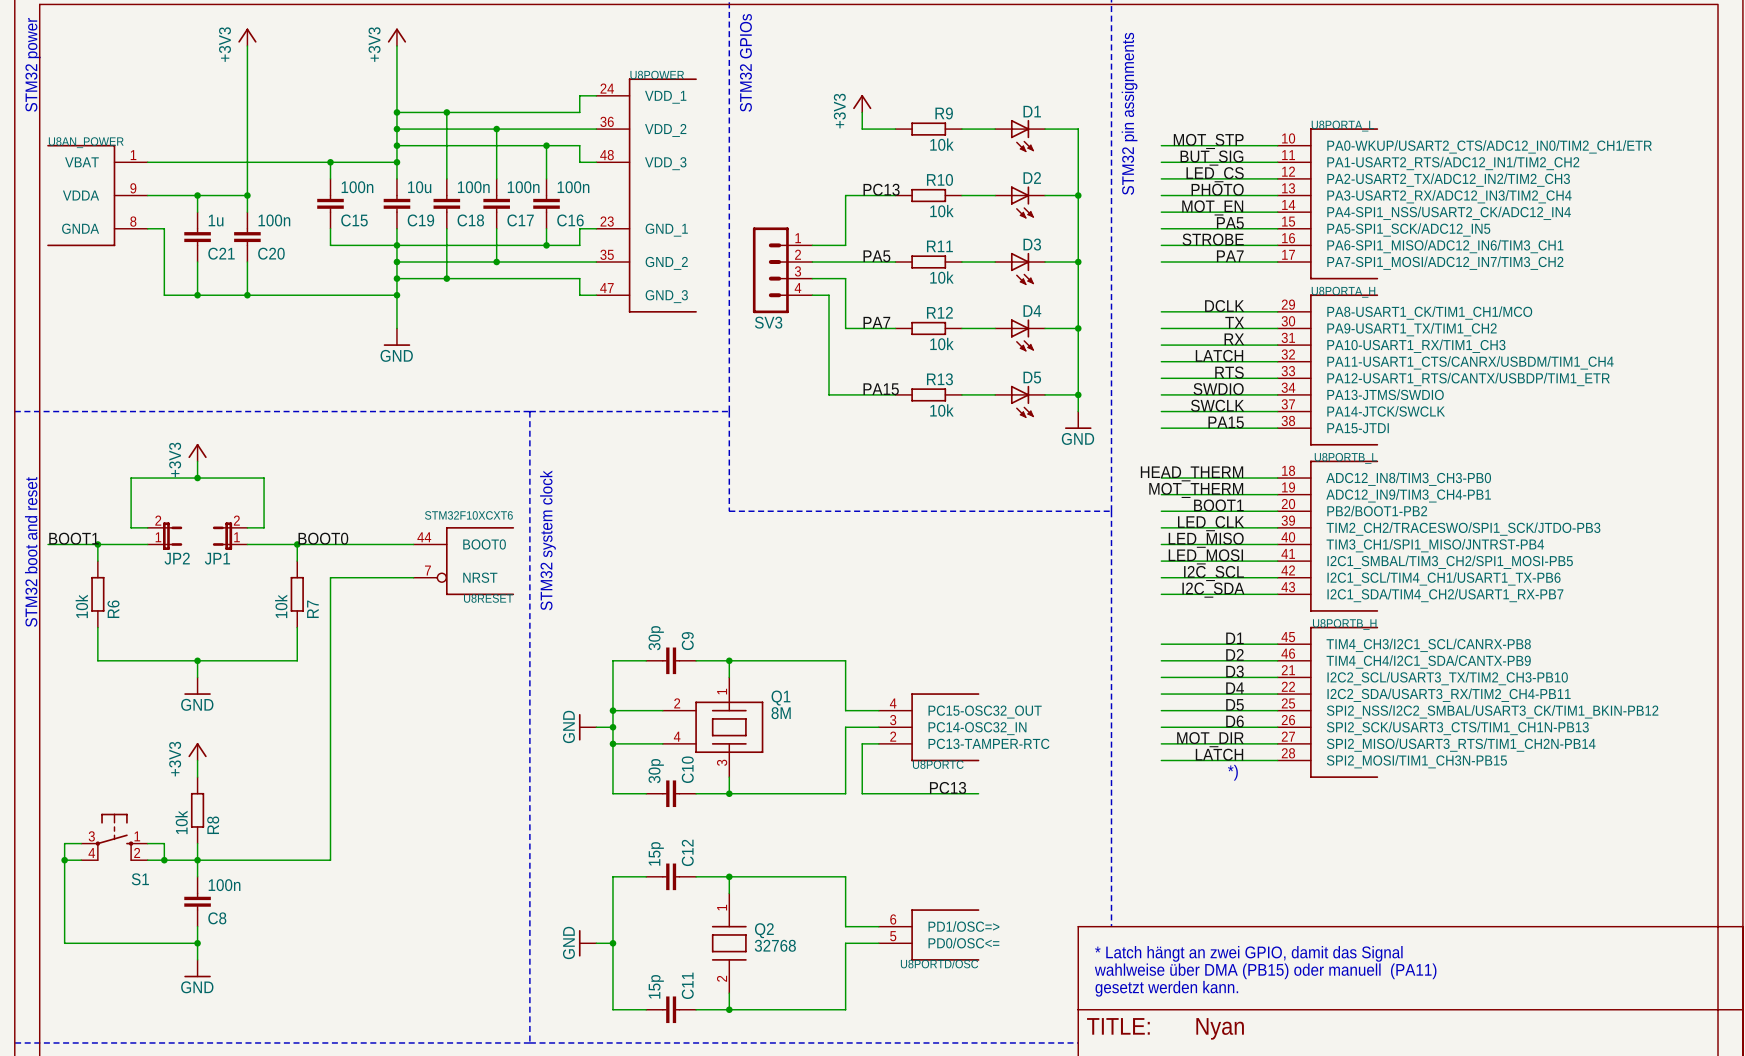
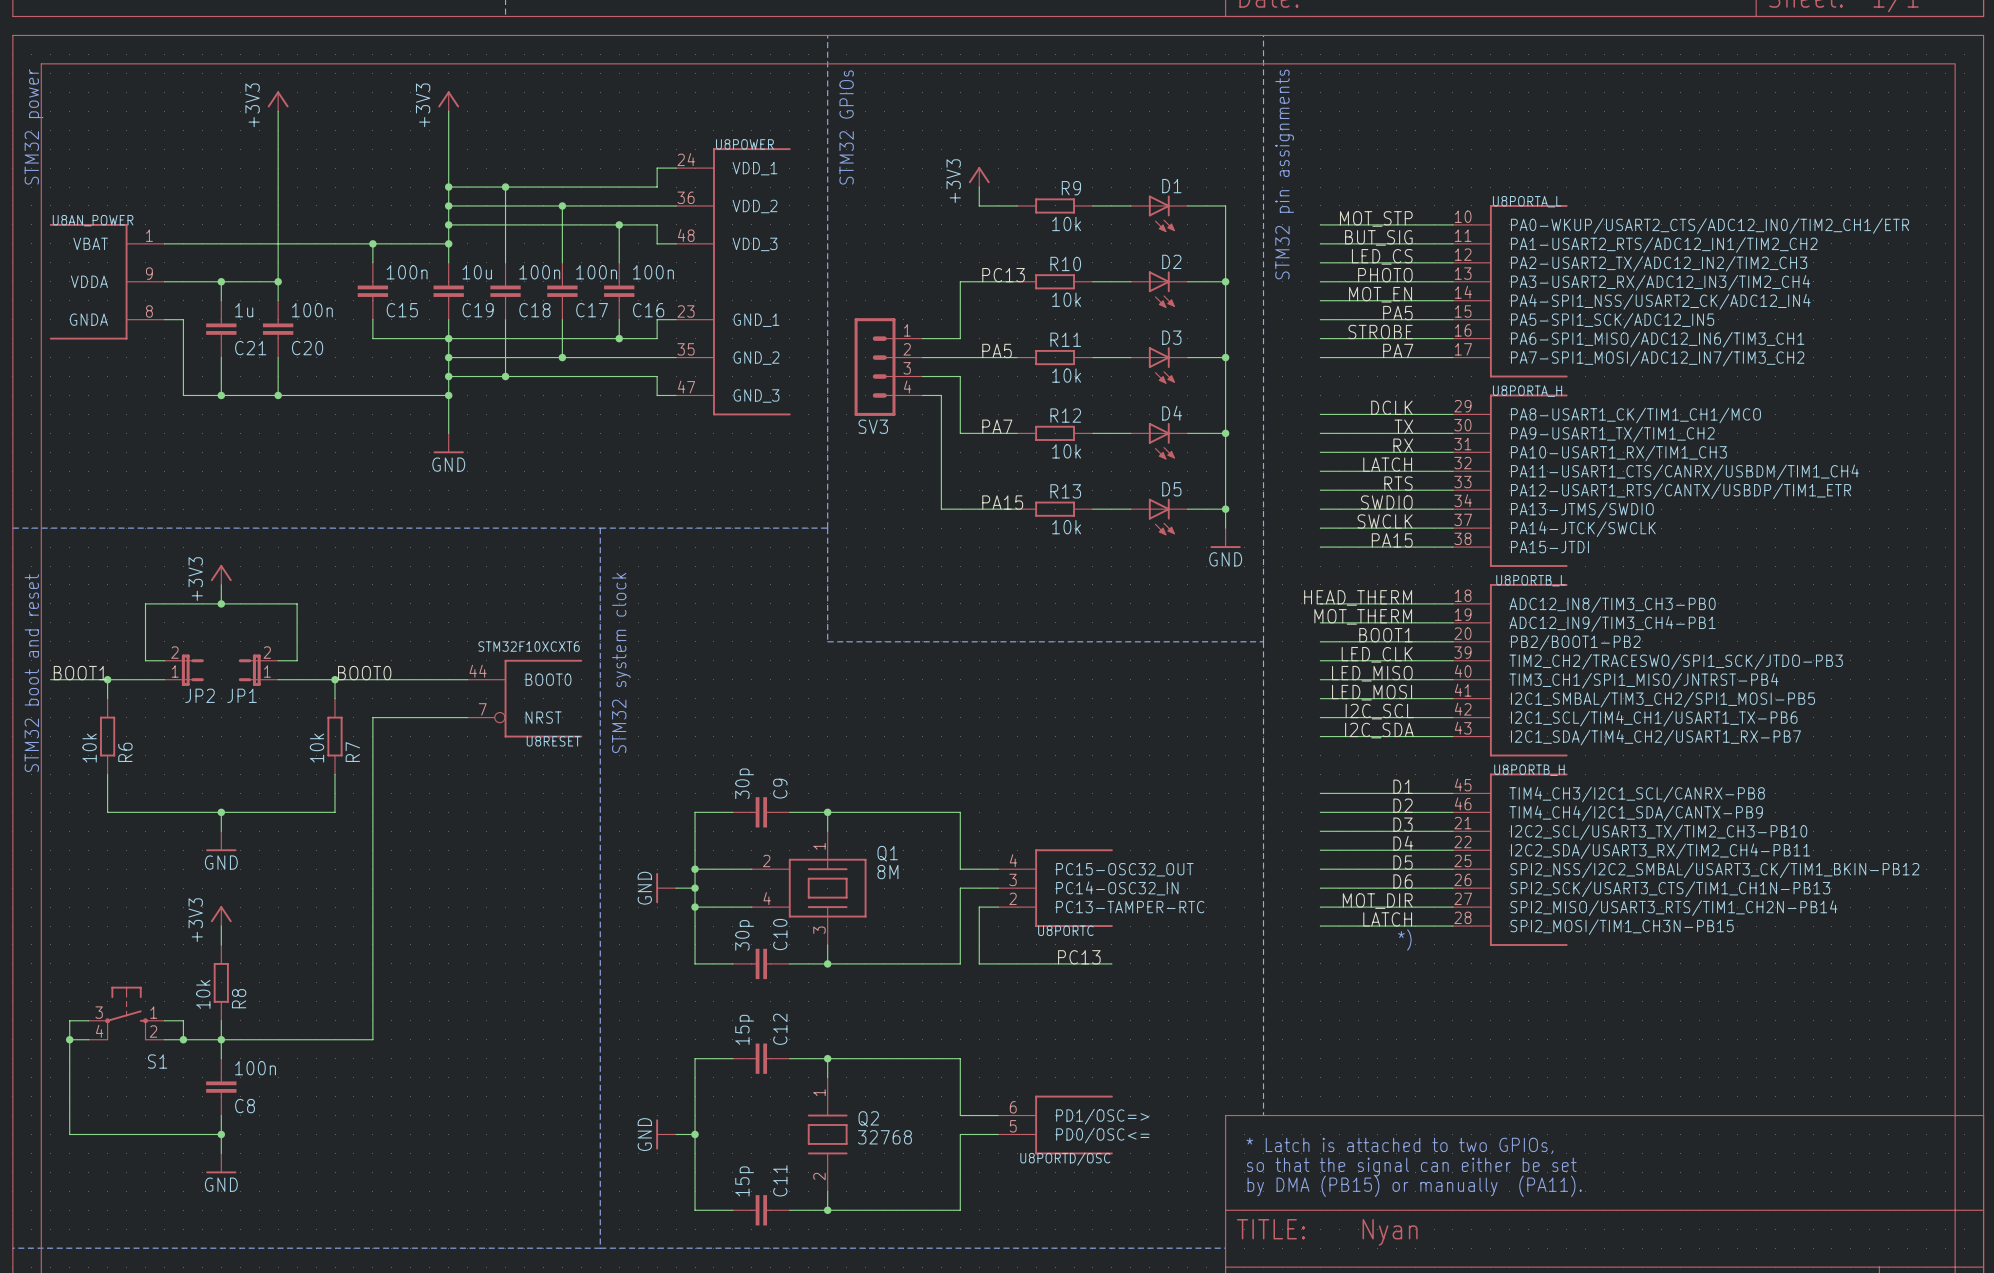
text: * Latch hängt an zwei GPIO, damit das Signal (1248, 953) -> * Latch is attached to two GPIOs, (1399, 1145)
text: wahlweise über DMA (PB15) oder manuell (PA11) (1265, 971) -> so that the signal can either be set (1411, 1167)
text: gesetzt werden kann. (1166, 988) -> by DMA (PB15) or manually (PA11). (1414, 1186)

